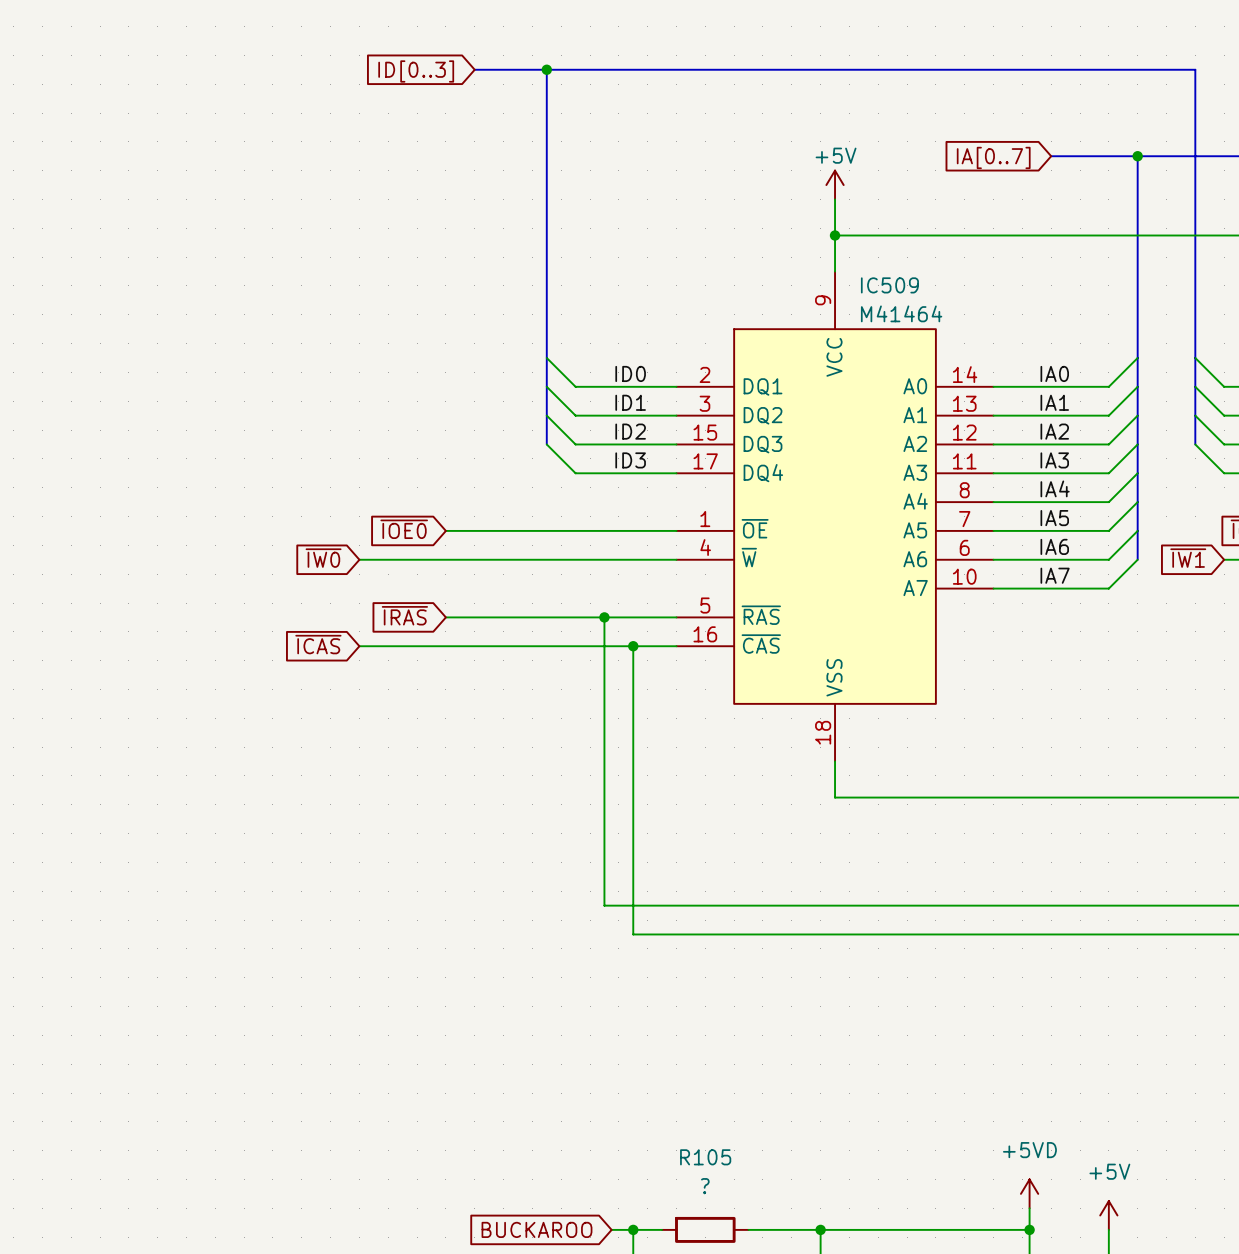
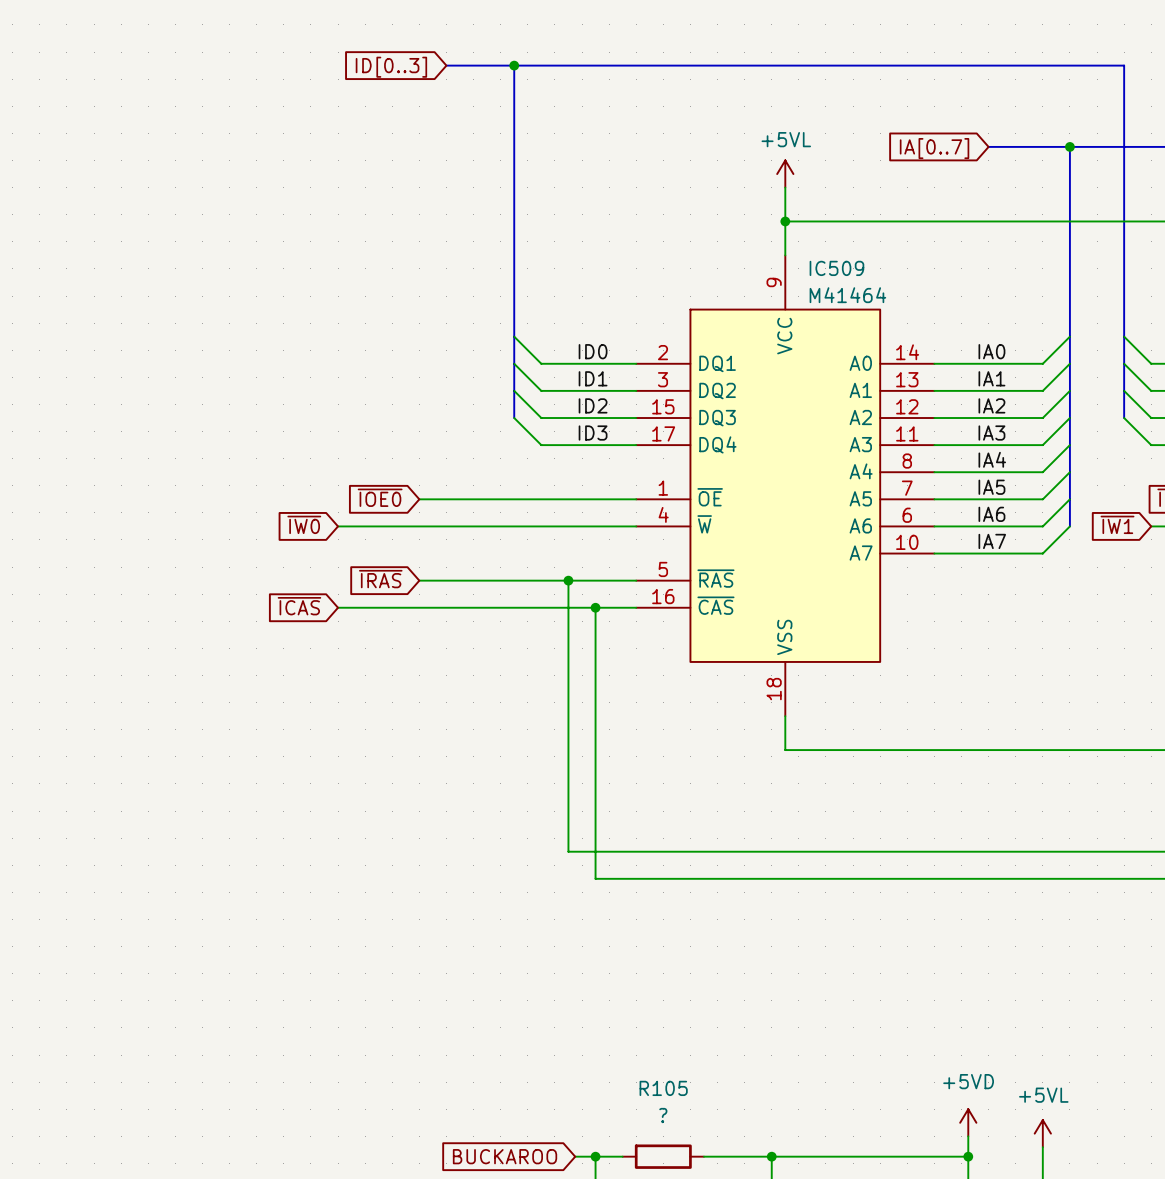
power symbol: +5V (835, 185) -> +5VL (785, 174)
power symbol: +5V (1108, 1215) -> +5VL (1042, 1133)

